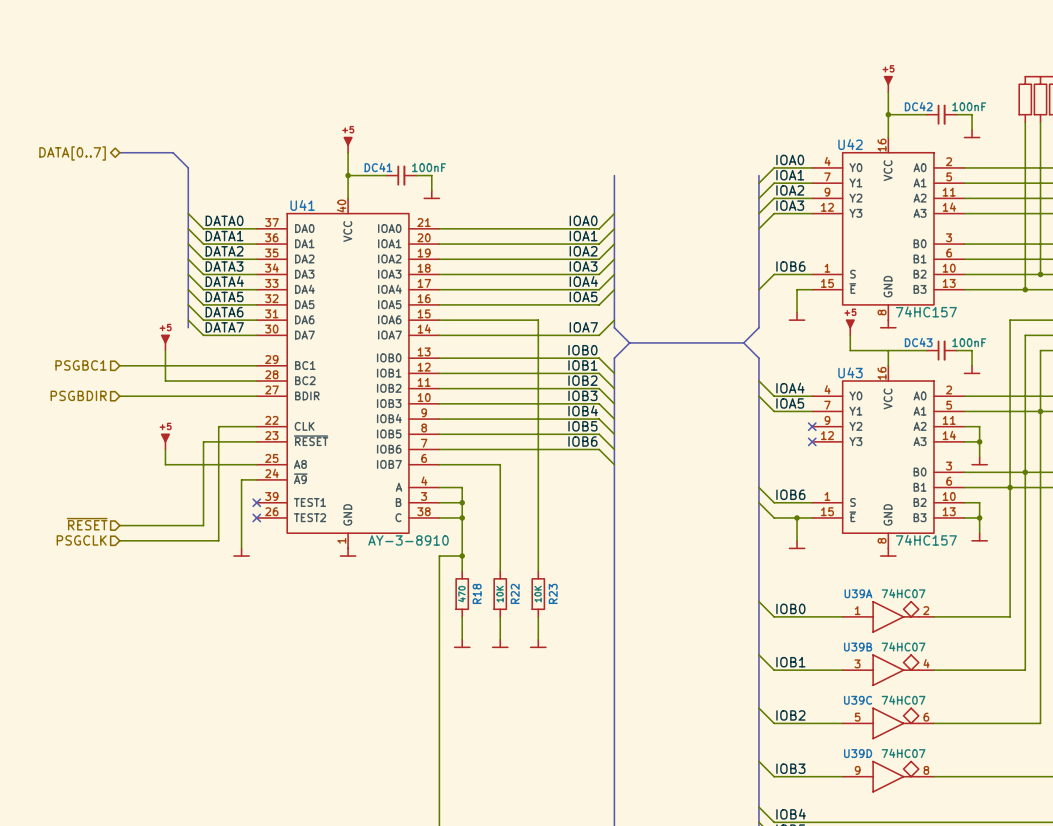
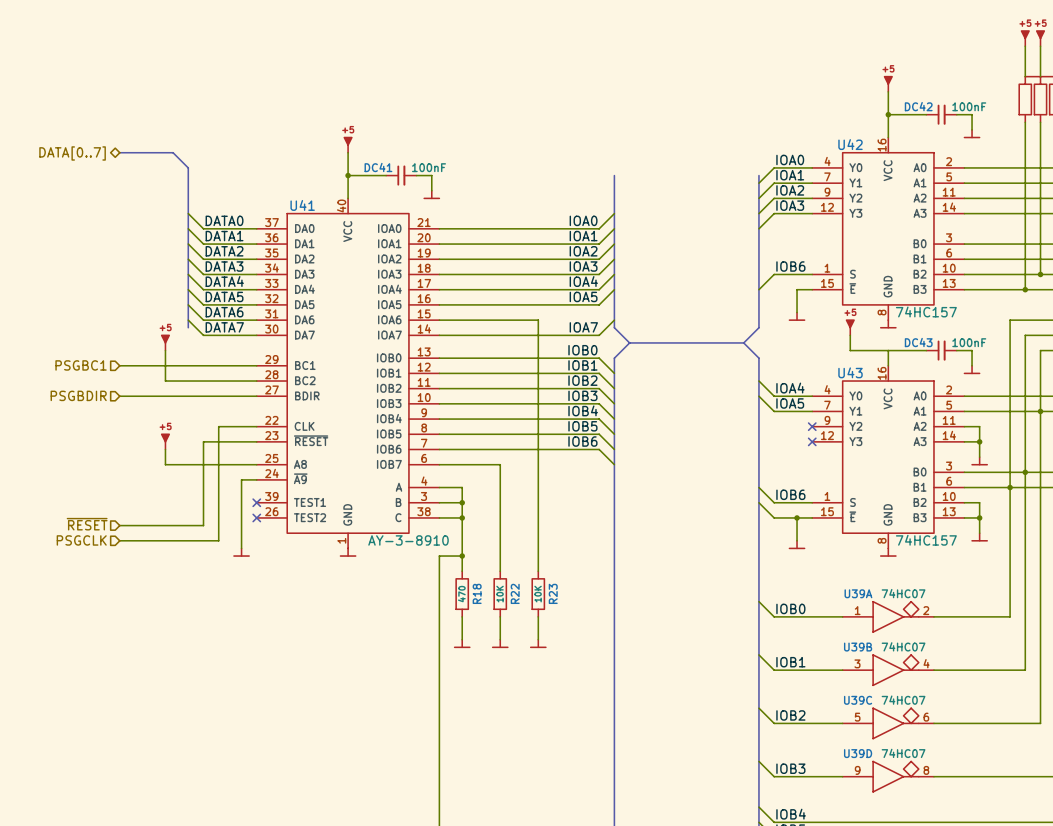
power symbol: none -> (1025, 38)
power symbol: none -> (1040, 38)
wire: none -> (1025, 46) (1025, 76)
wire: none -> (1040, 46) (1040, 76)

